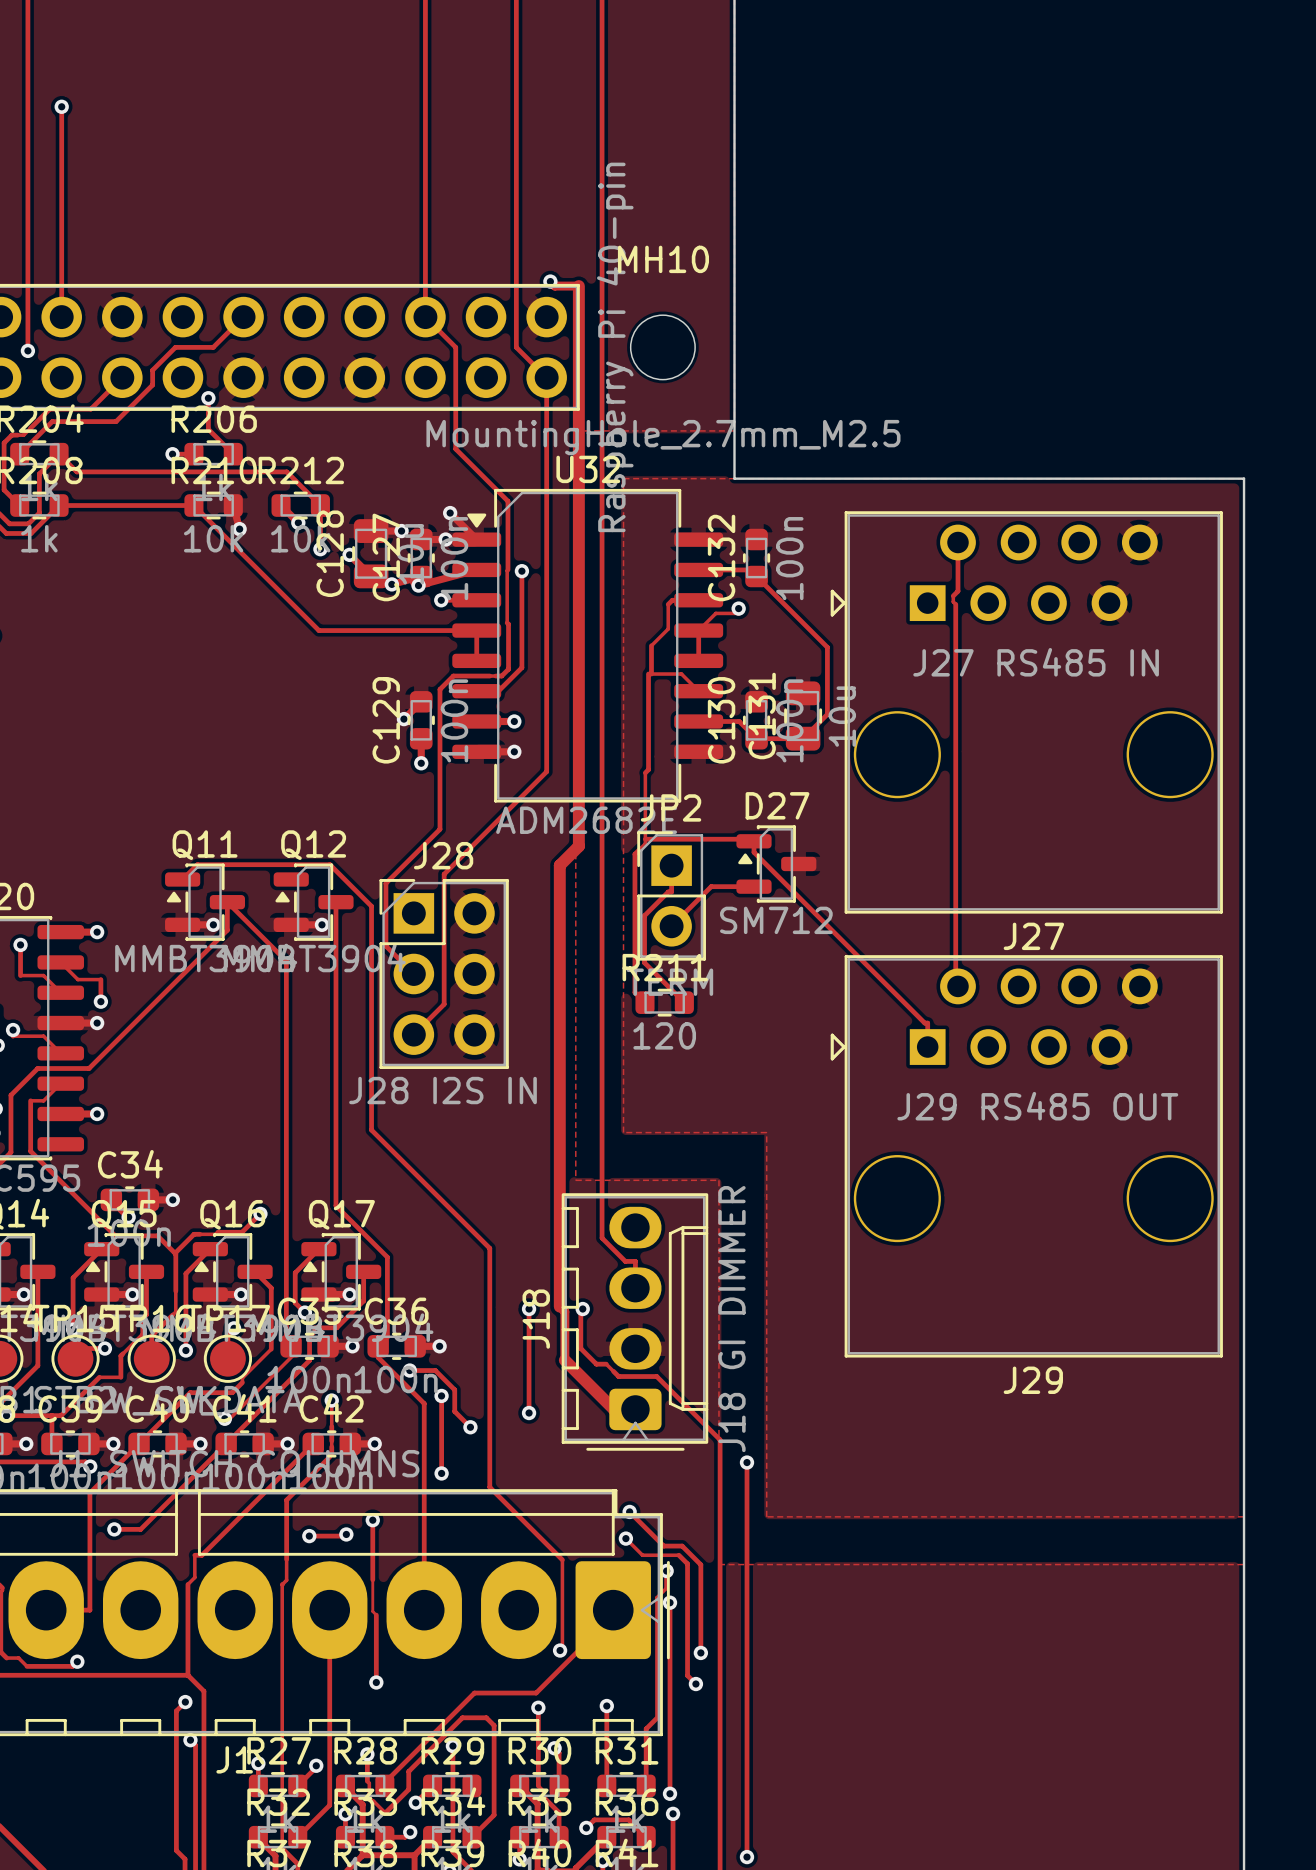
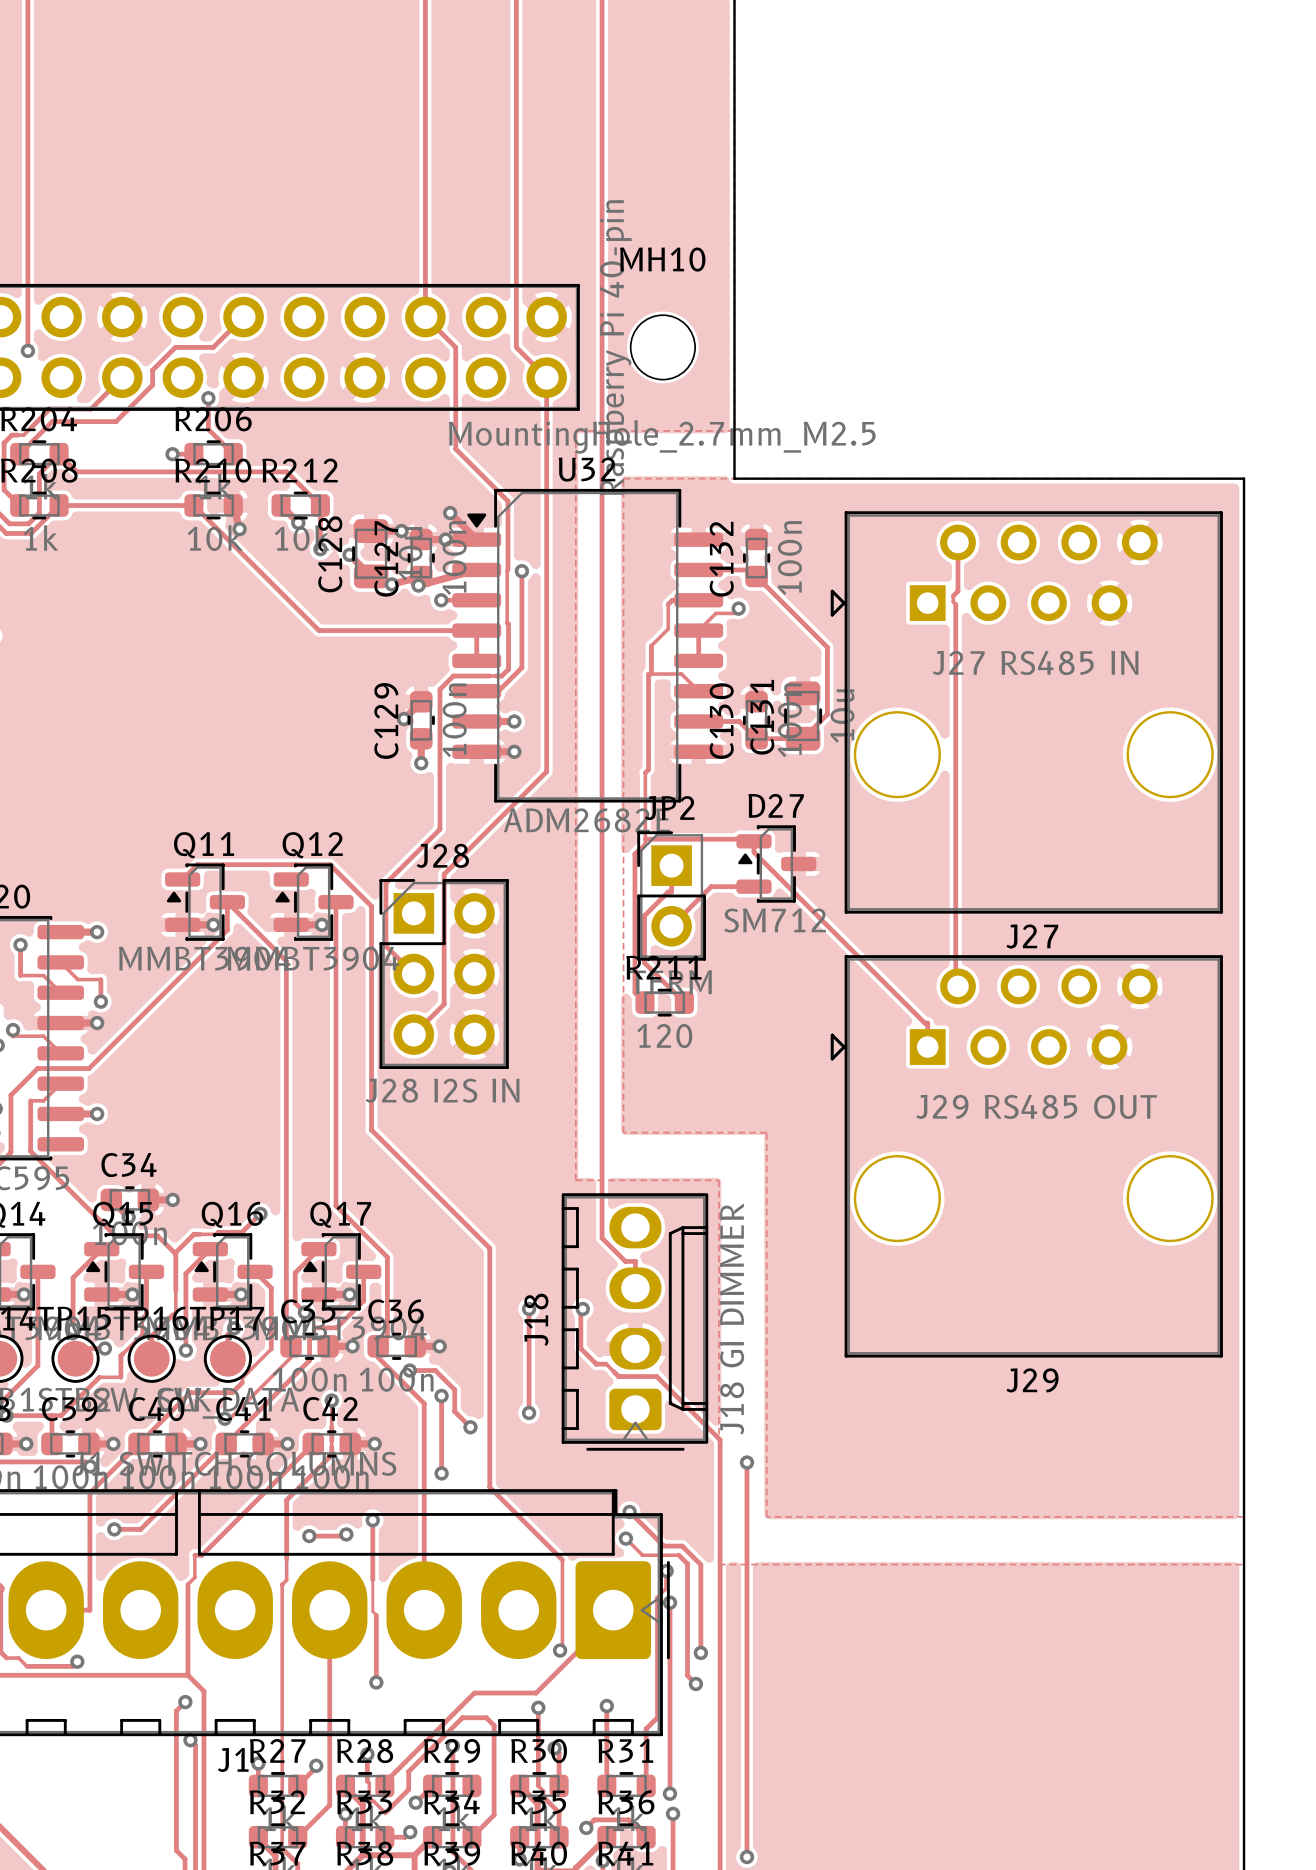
track: (61, 106) (61, 317) -> none
via: (61, 106) -> none
track: (550, 281) (554, 286) (578, 286) (578, 846) (559, 865) (559, 1306) (564, 1311) (564, 1360) (613, 1409) (635, 1409) -> none
via: (550, 281) -> none

